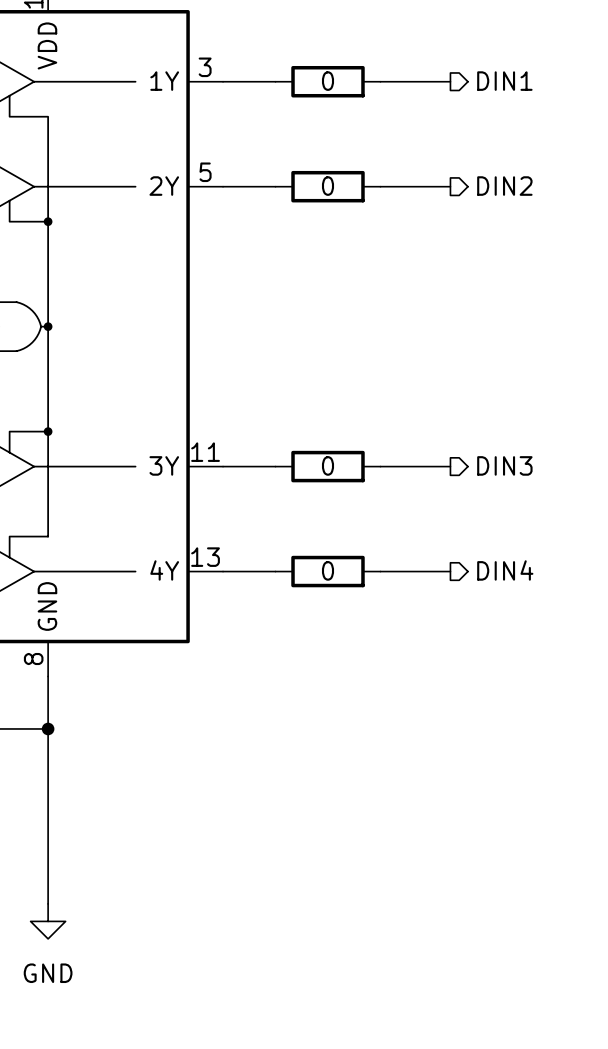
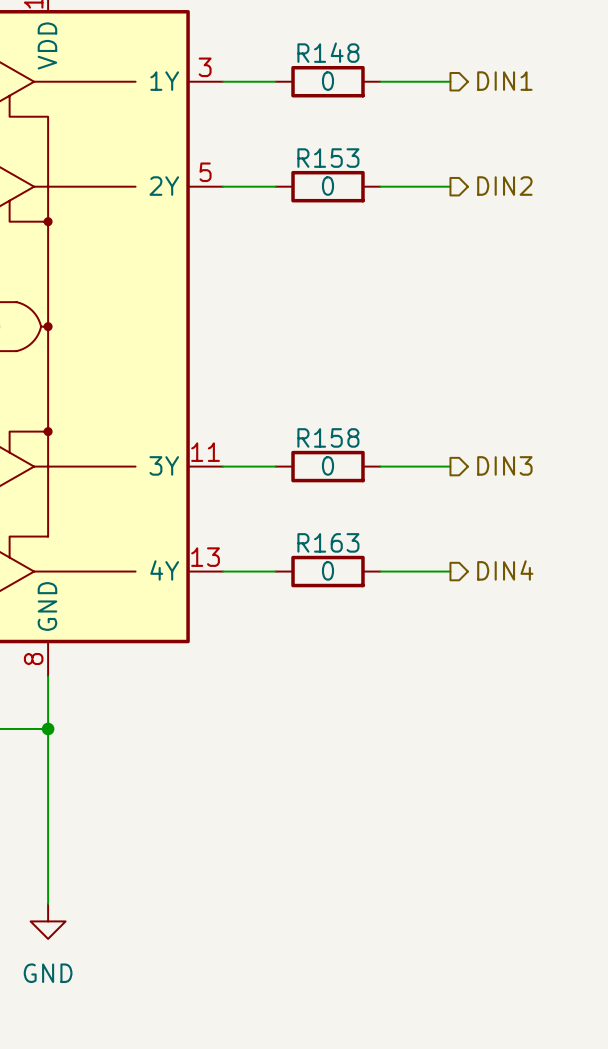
R148 name: none -> R148 (328, 52)
R153 name: none -> R153 (328, 158)
R158 name: none -> R158 (328, 437)
R163 name: none -> R163 (328, 542)

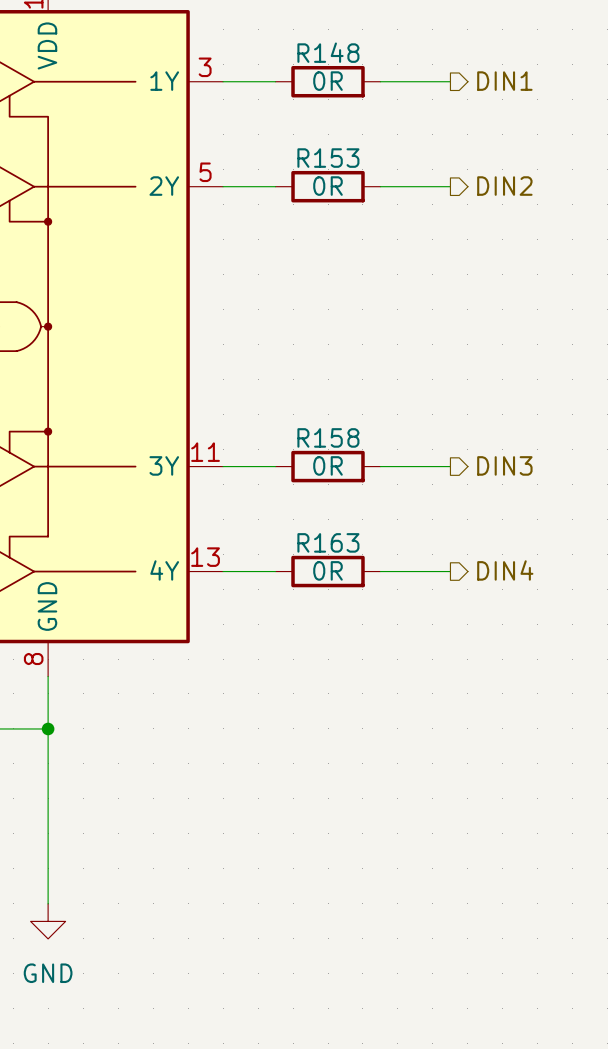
R148 value: 0 (328, 81) -> 0R (328, 81)
R153 value: 0 (328, 186) -> 0R (328, 186)
R158 value: 0 (328, 465) -> 0R (328, 465)
R163 value: 0 (328, 570) -> 0R (328, 570)

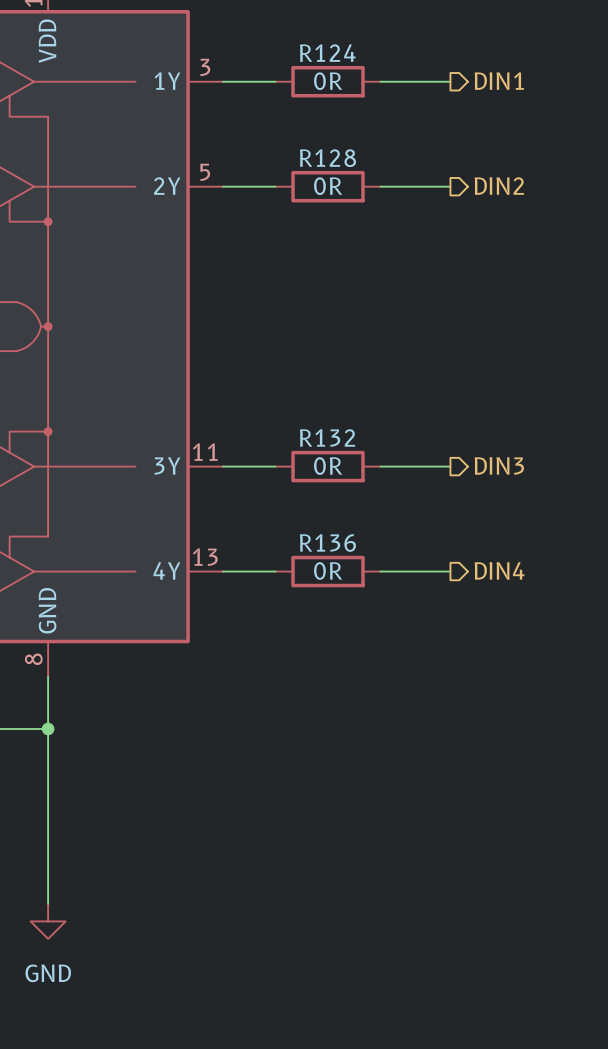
R148 name: R148 (328, 52) -> R124 (327, 53)
R153 name: R153 (328, 158) -> R128 (327, 158)
R158 name: R158 (328, 437) -> R132 (327, 437)
R163 name: R163 (328, 542) -> R136 (327, 543)

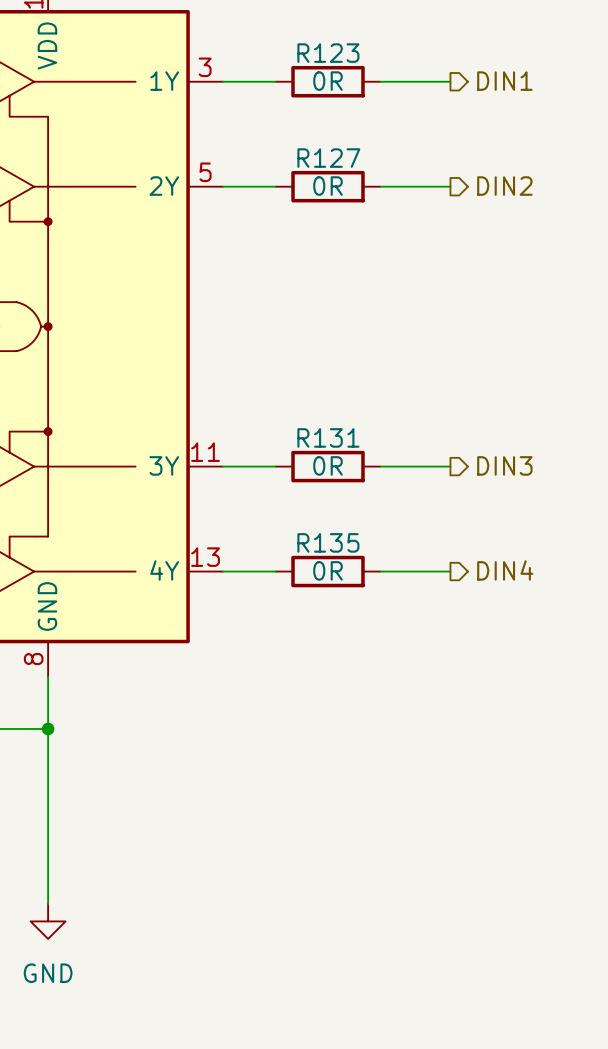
R124 name: R124 (327, 53) -> R123 (328, 53)
R128 name: R128 (327, 158) -> R127 (328, 158)
R132 name: R132 (327, 437) -> R131 (328, 437)
R136 name: R136 (327, 543) -> R135 (328, 542)

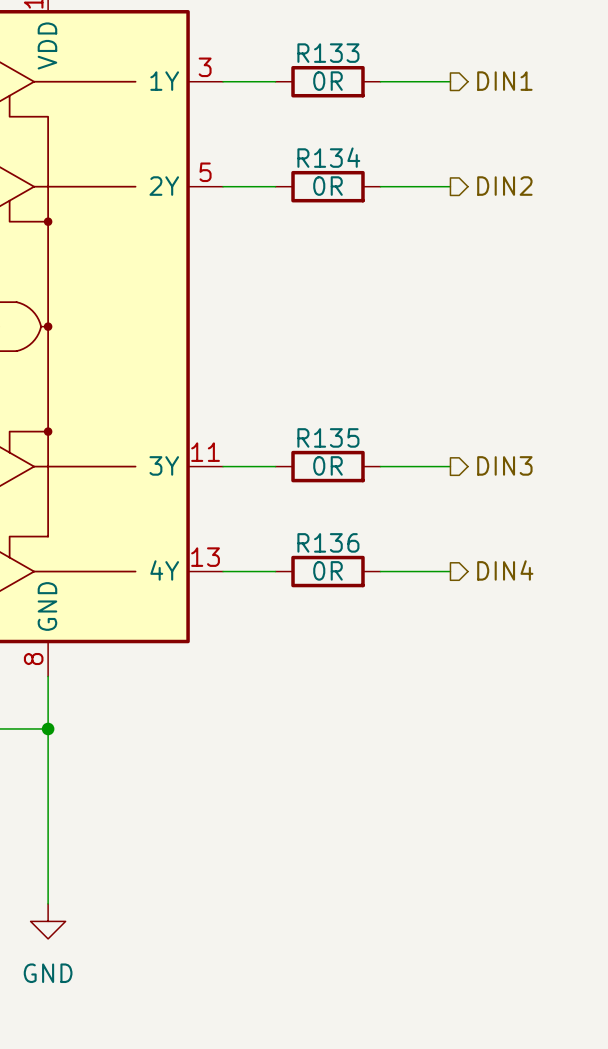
R123 name: R123 (328, 53) -> R133 (328, 53)
R127 name: R127 (328, 158) -> R134 (328, 157)
R131 name: R131 (328, 437) -> R135 (328, 437)
R135 name: R135 (328, 542) -> R136 (328, 542)

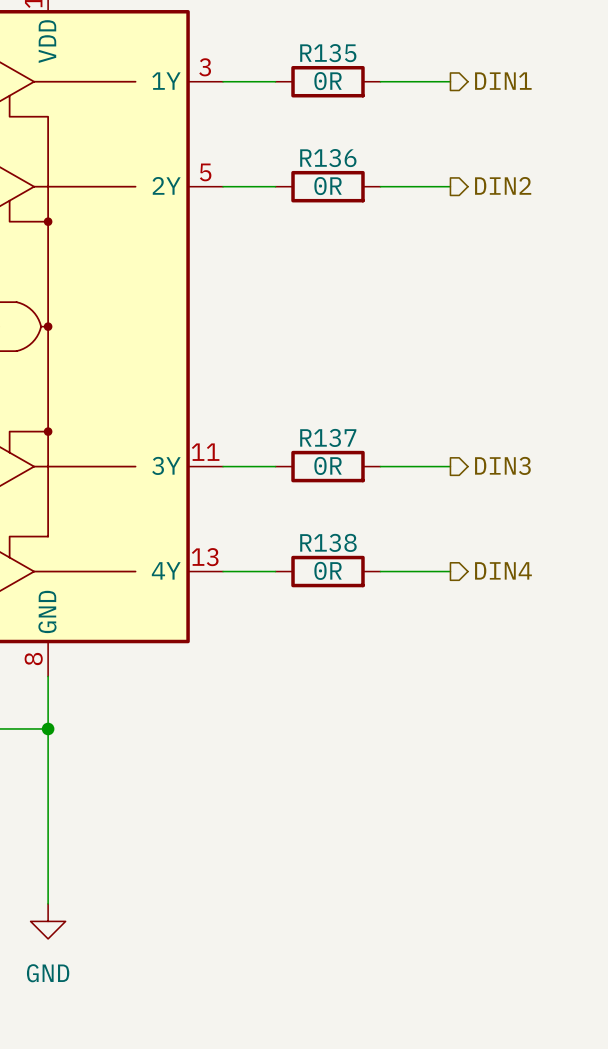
R133 name: R133 (328, 53) -> R135 (328, 53)
R134 name: R134 (328, 157) -> R136 (328, 158)
R135 name: R135 (328, 437) -> R137 (328, 437)
R136 name: R136 (328, 542) -> R138 (328, 542)

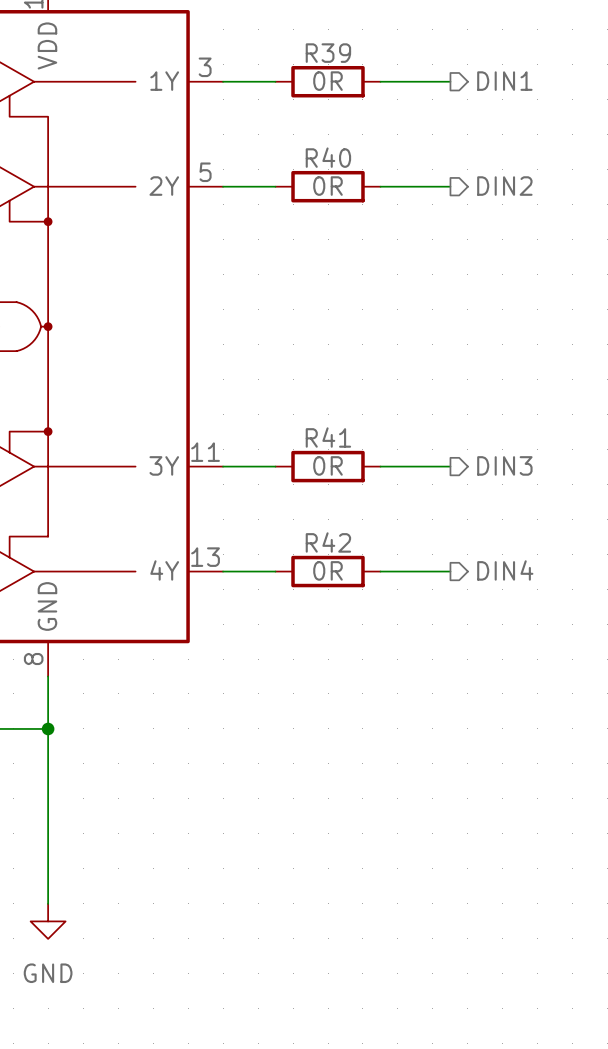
R135 name: R135 (328, 53) -> R39 (328, 53)
R136 name: R136 (328, 158) -> R40 (328, 157)
R137 name: R137 (328, 437) -> R41 (328, 437)
R138 name: R138 (328, 542) -> R42 (328, 542)

